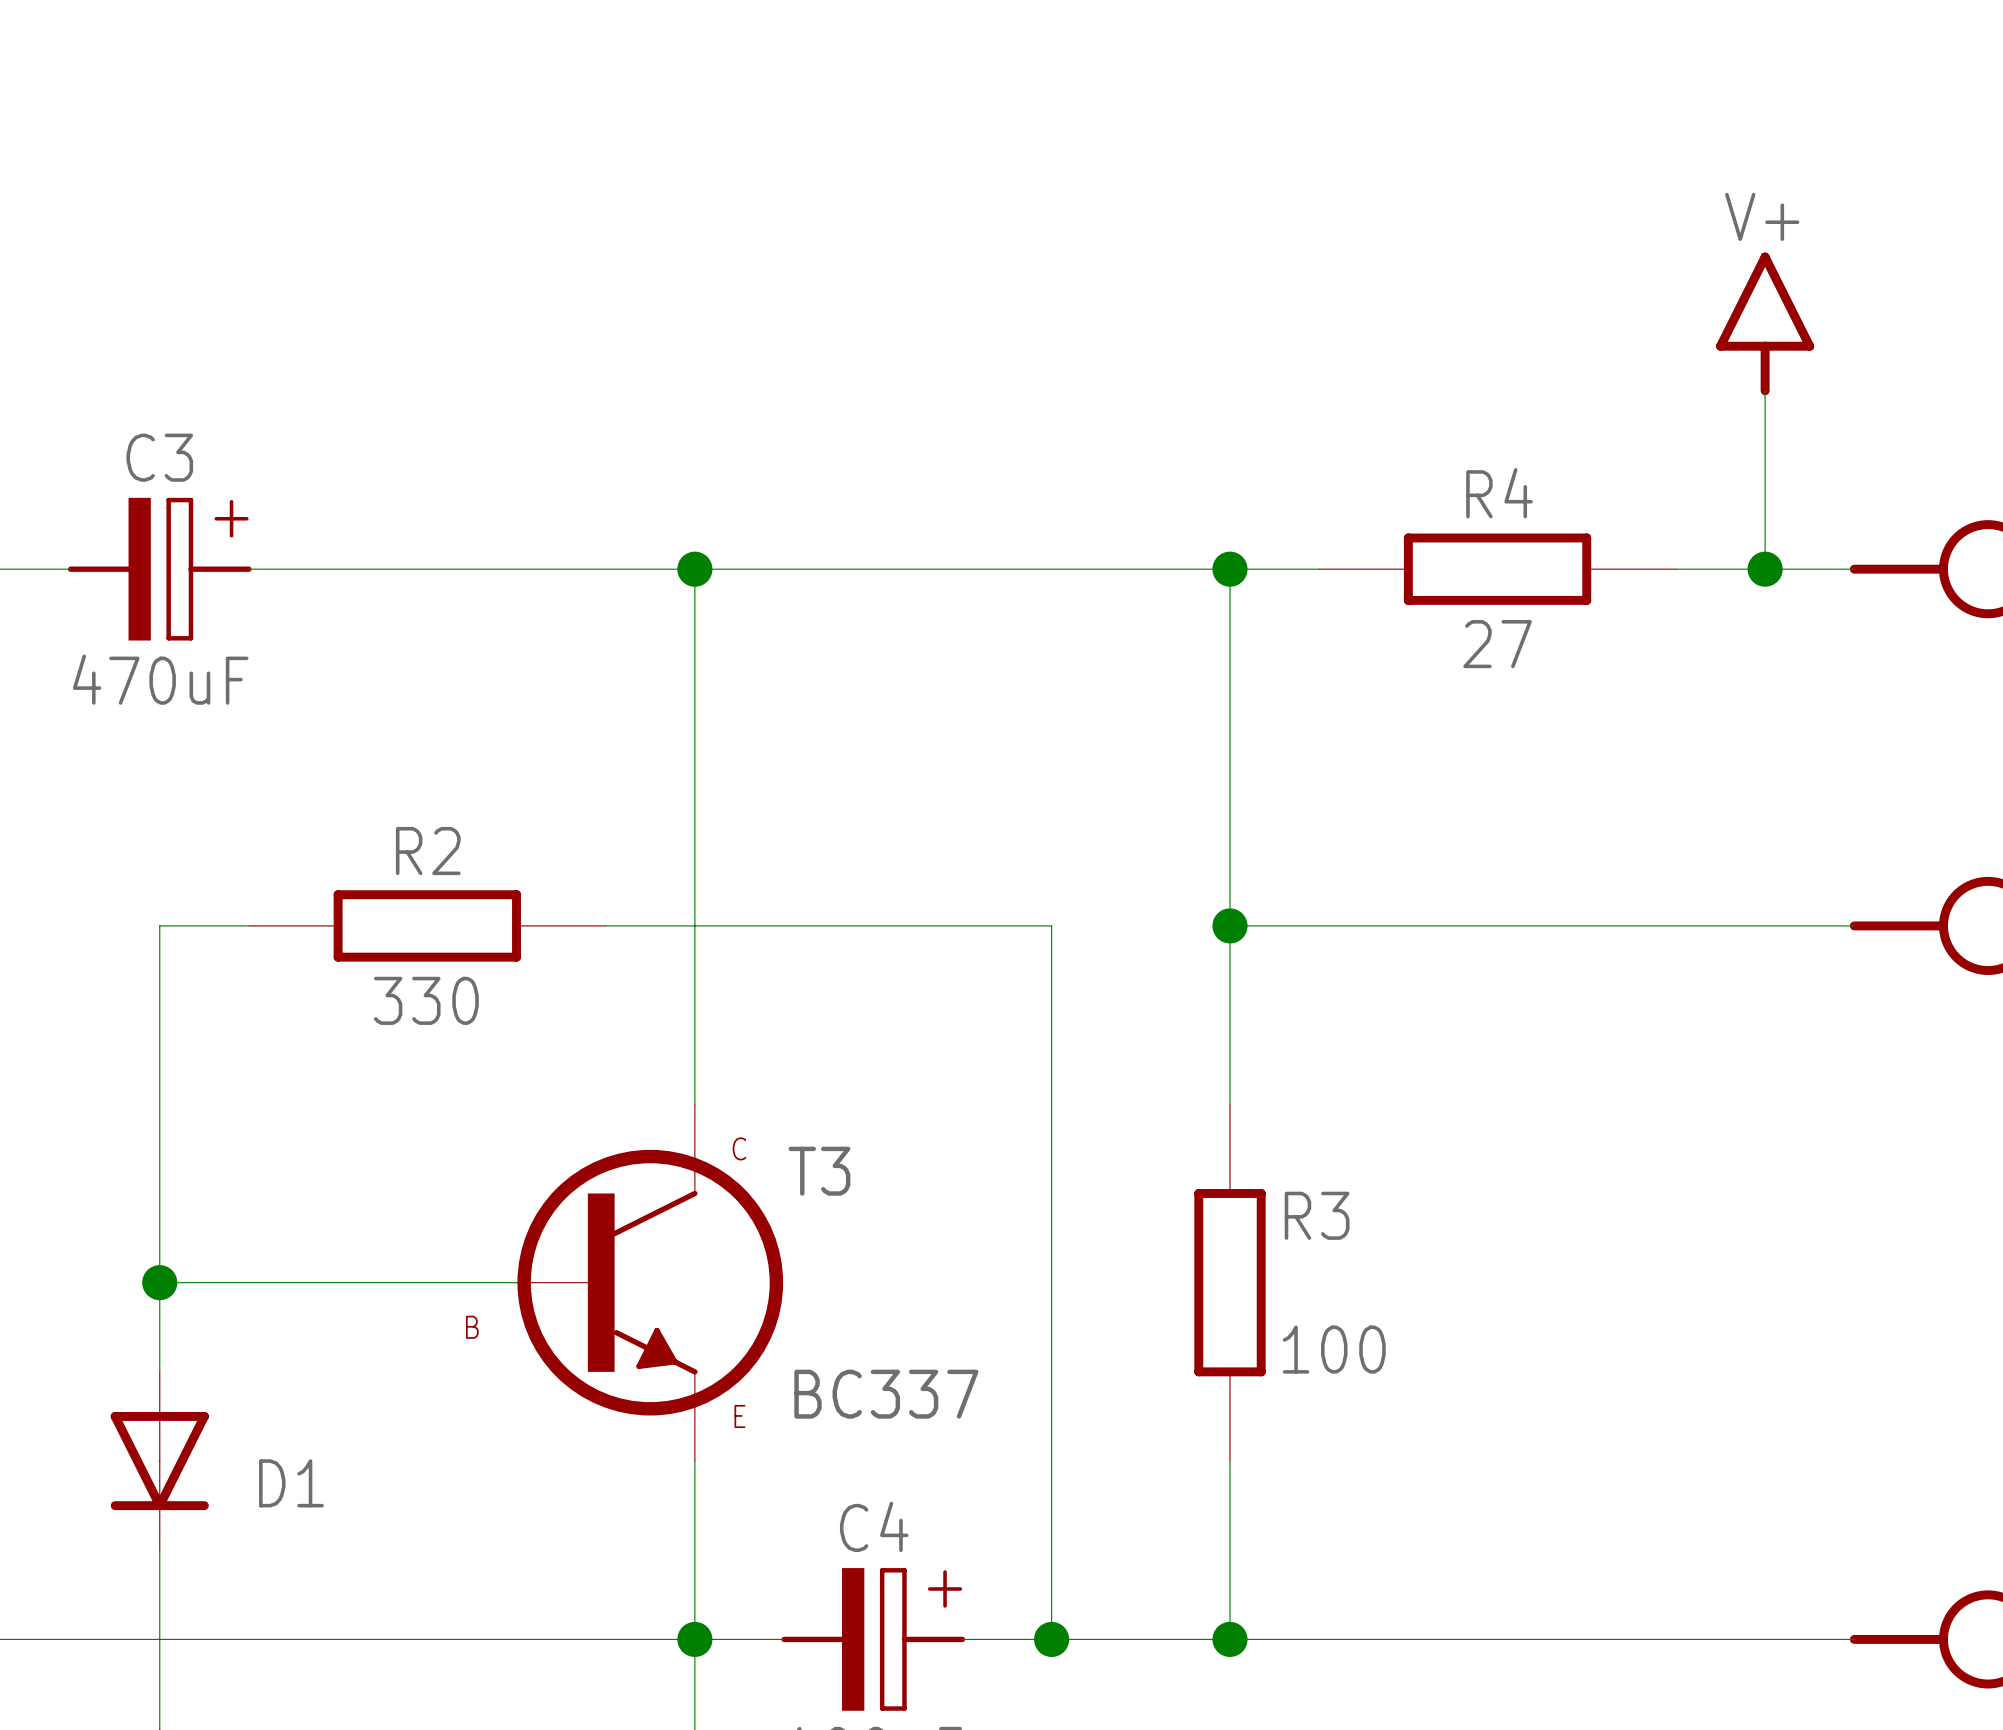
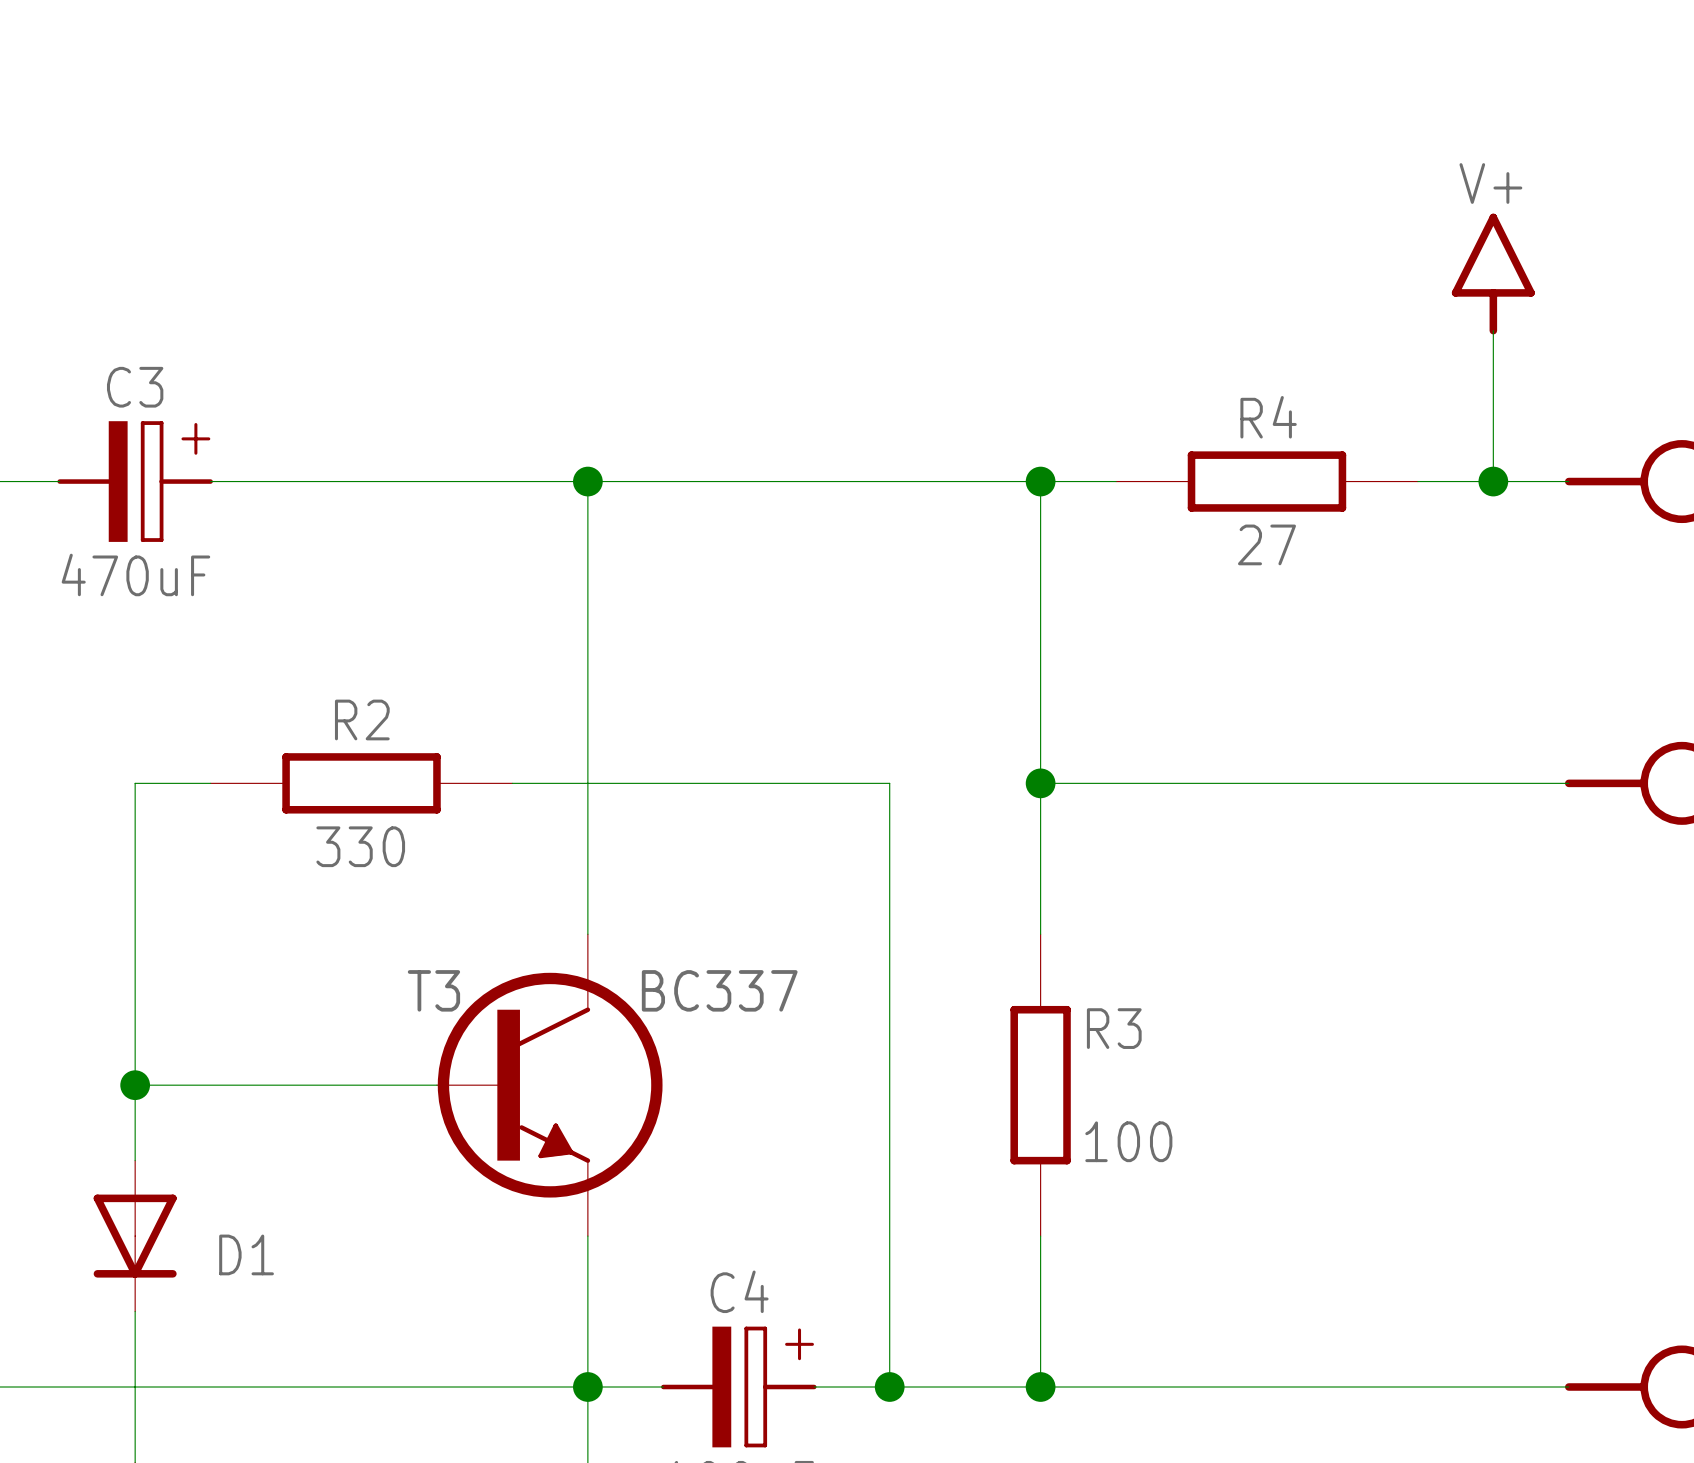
T3 text: C (739, 1148) -> none
T3 name position: T3 (819, 1171) -> T3 (433, 990)
T3 text: B (472, 1327) -> none
T3 value position: BC337 (886, 1394) -> BC337 (719, 990)
T3 text: E (739, 1416) -> none

